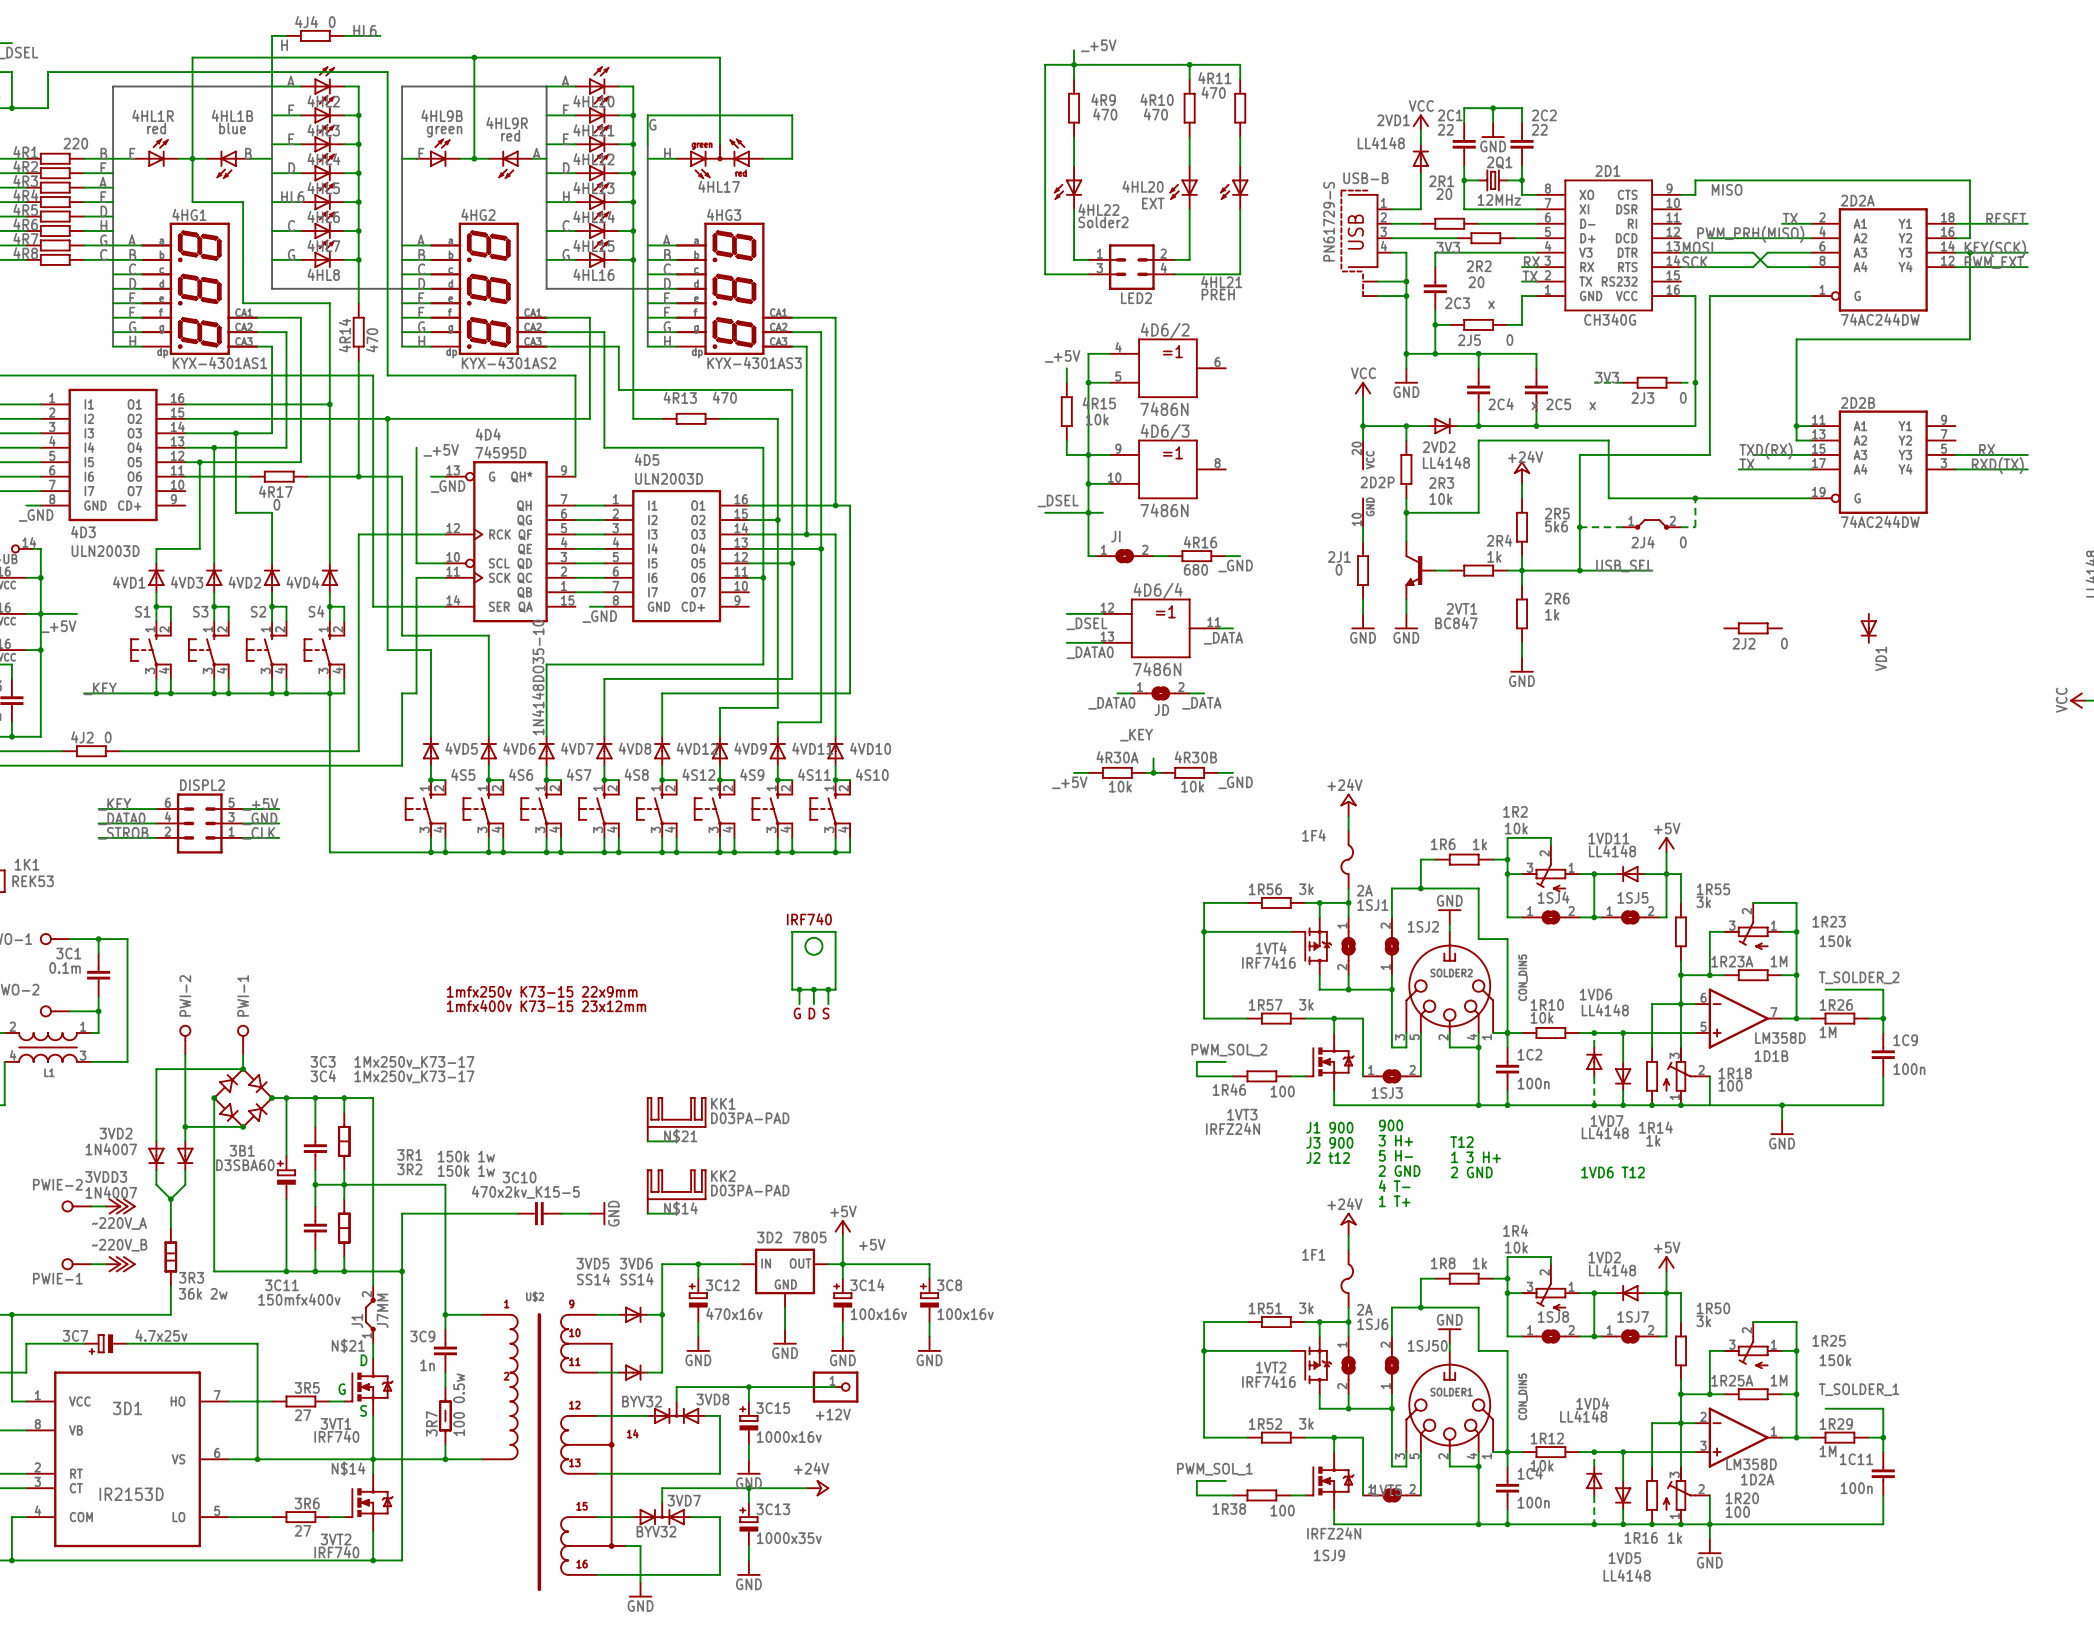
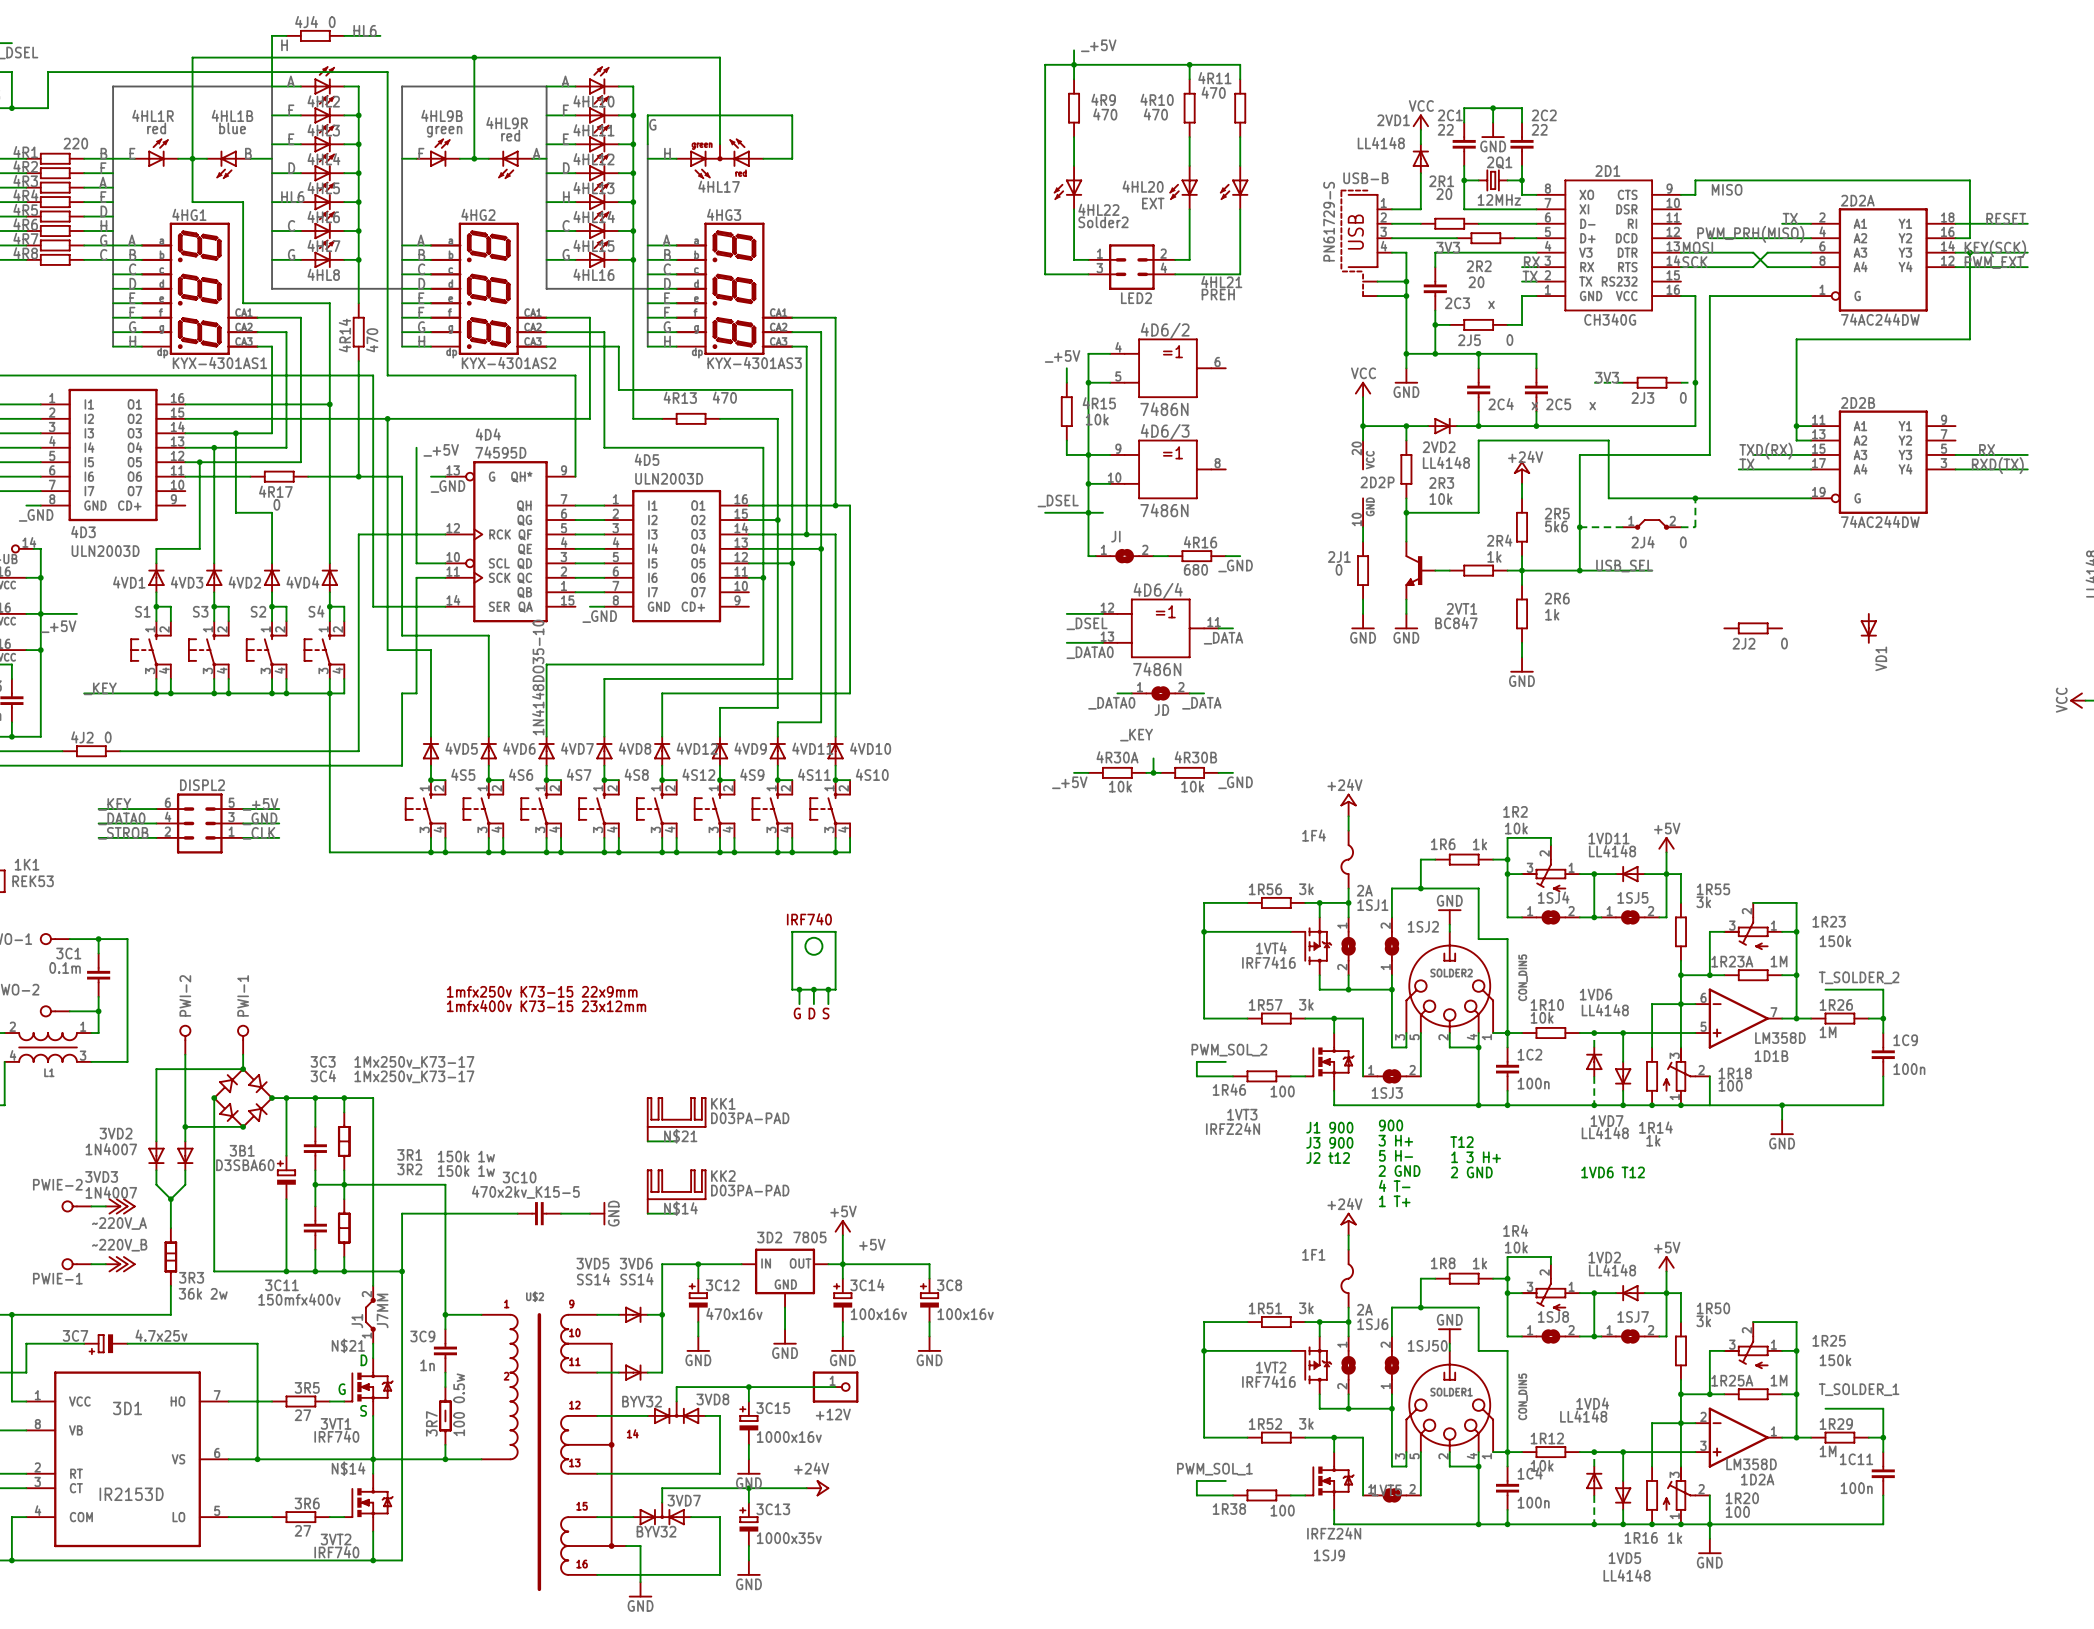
3VDD3 name: 3VDD3 (106, 1176) -> 3VD3 (101, 1176)

